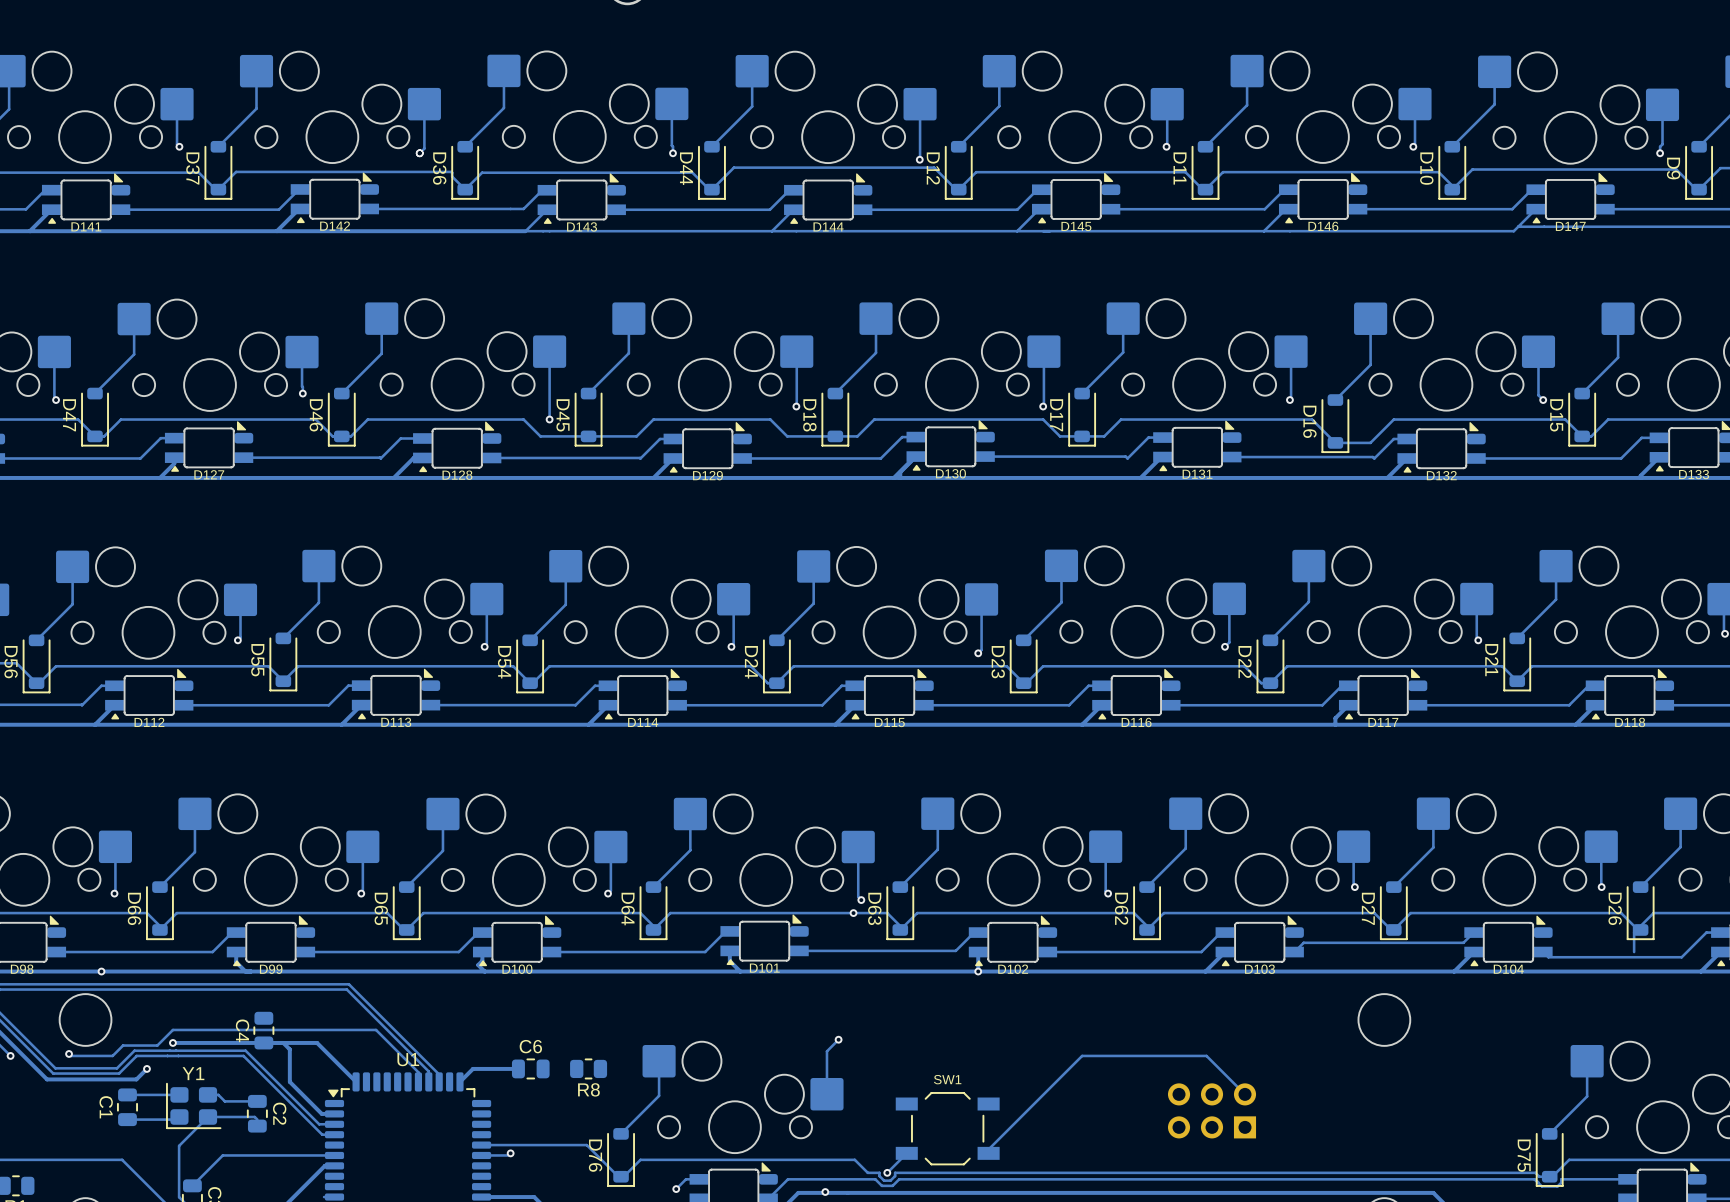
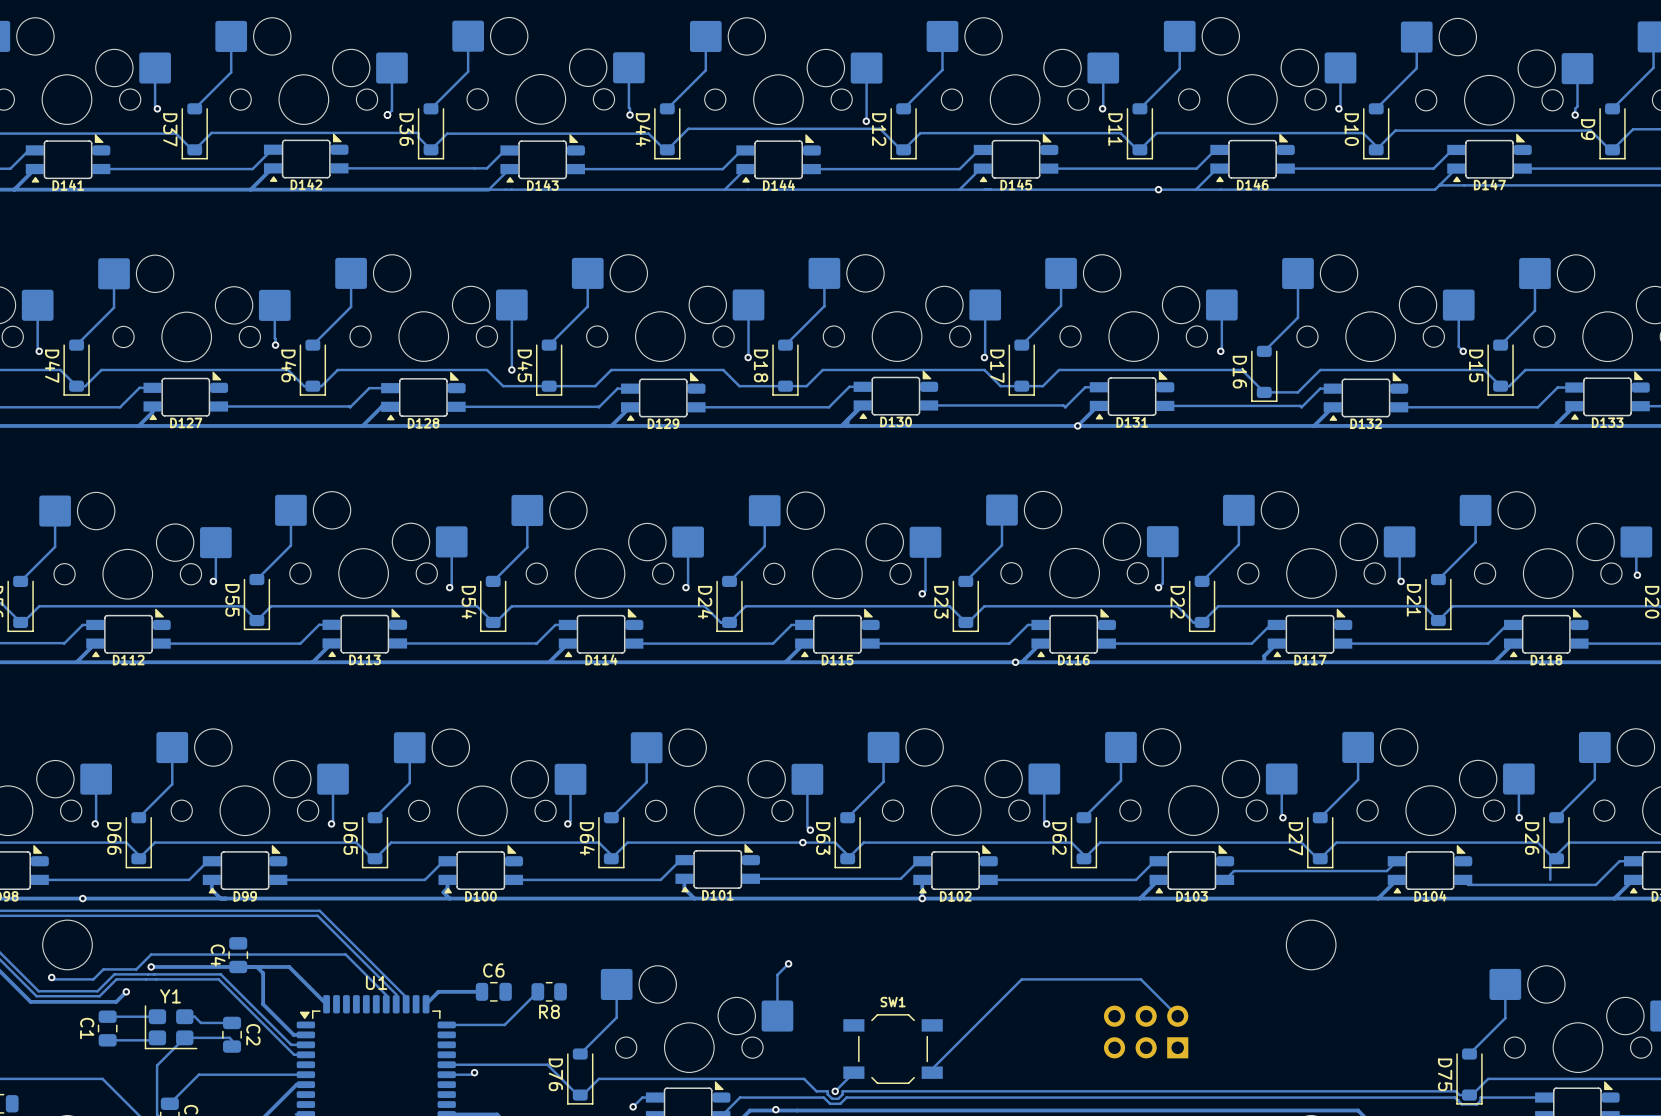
via: none -> (1158, 189)
via: none -> (1077, 425)
via: none -> (1015, 662)
track: none -> (537, 991) (504, 1024) (446, 1024)

